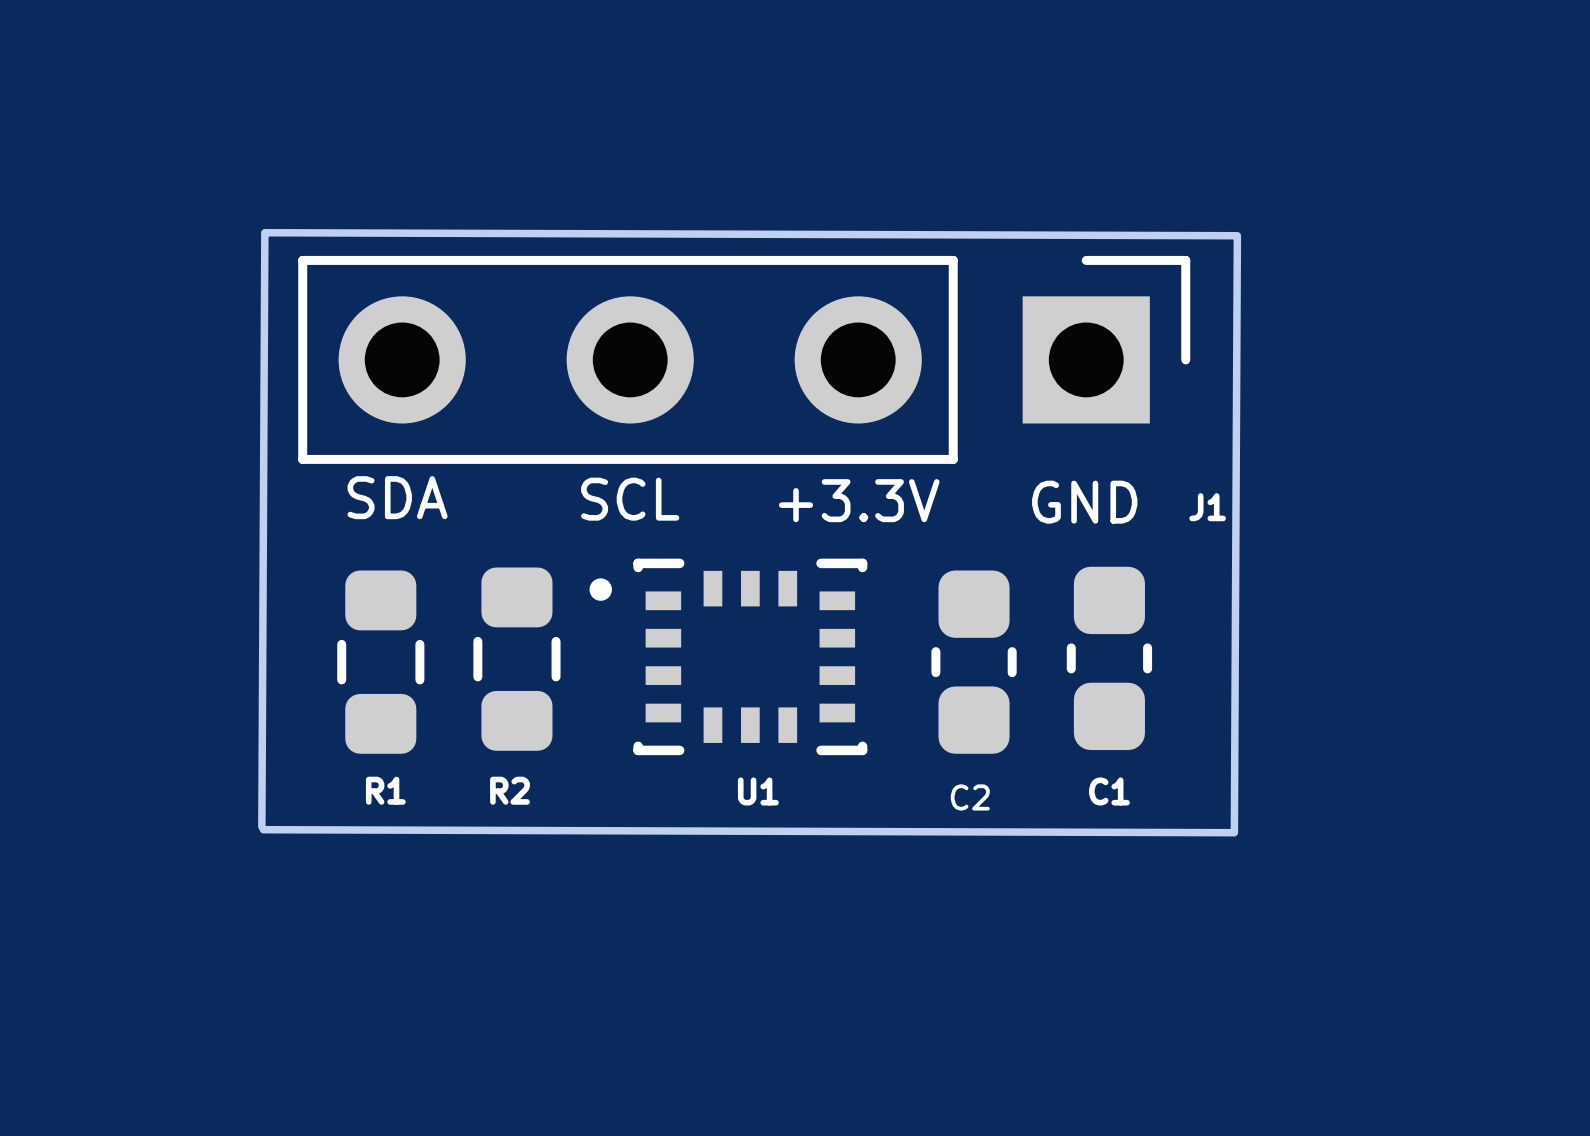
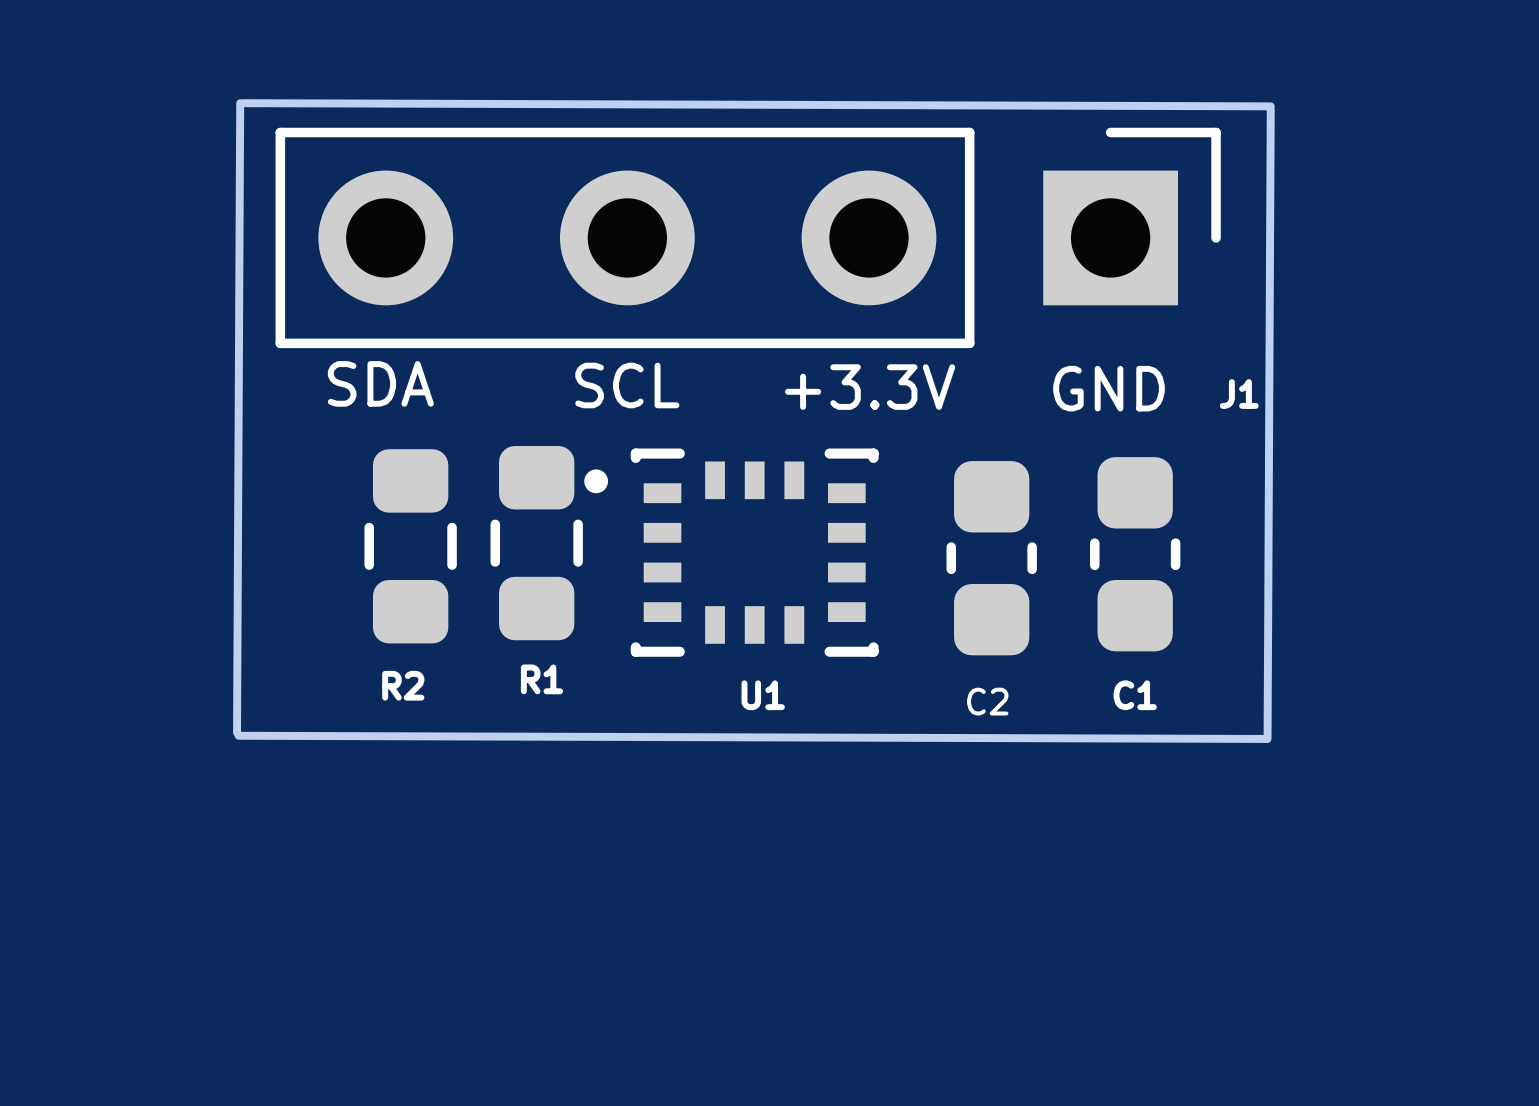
R2 position: (516, 659) -> (410, 546)
R1 position: (380, 662) -> (536, 543)

